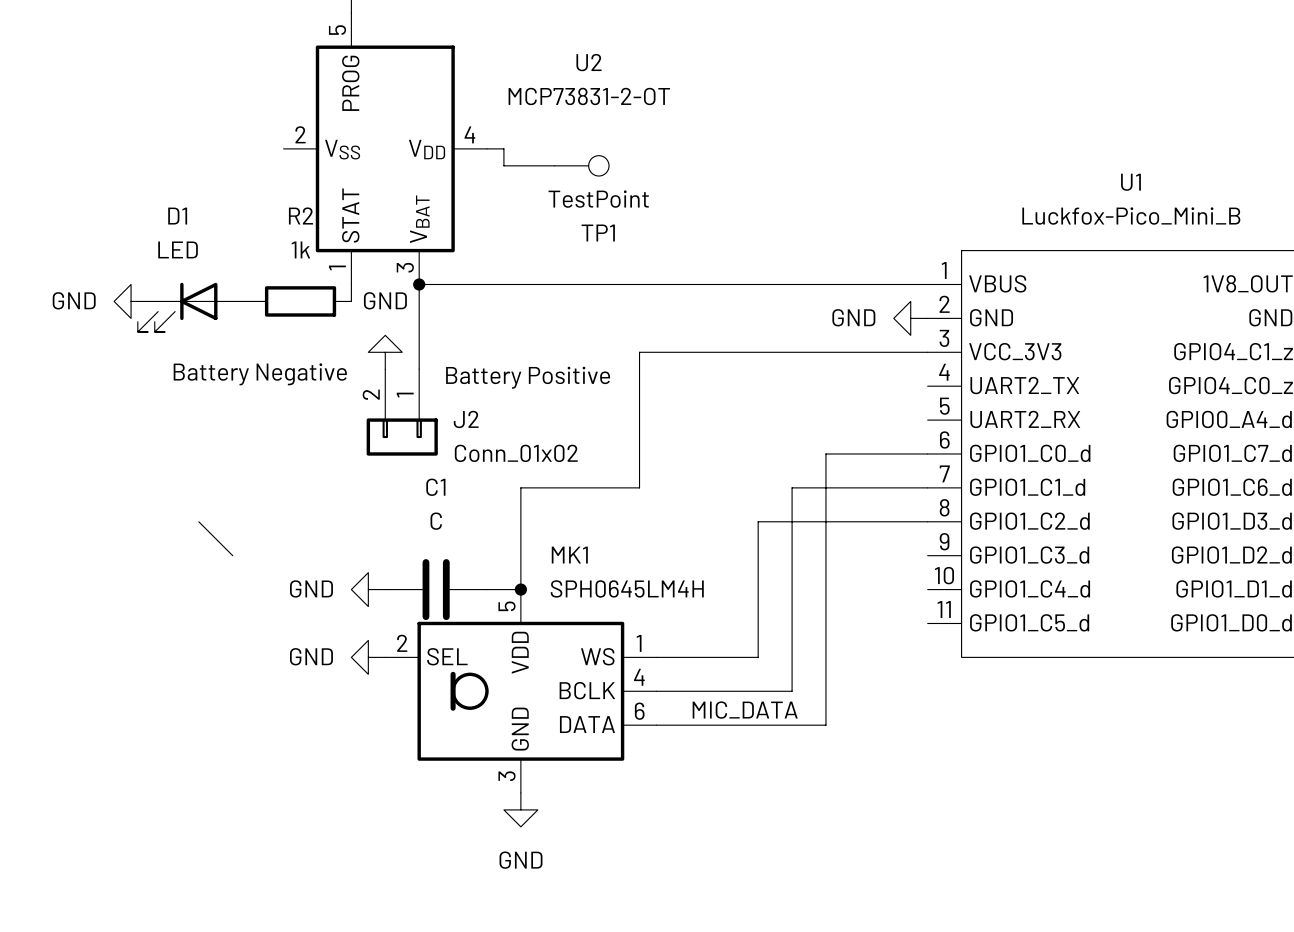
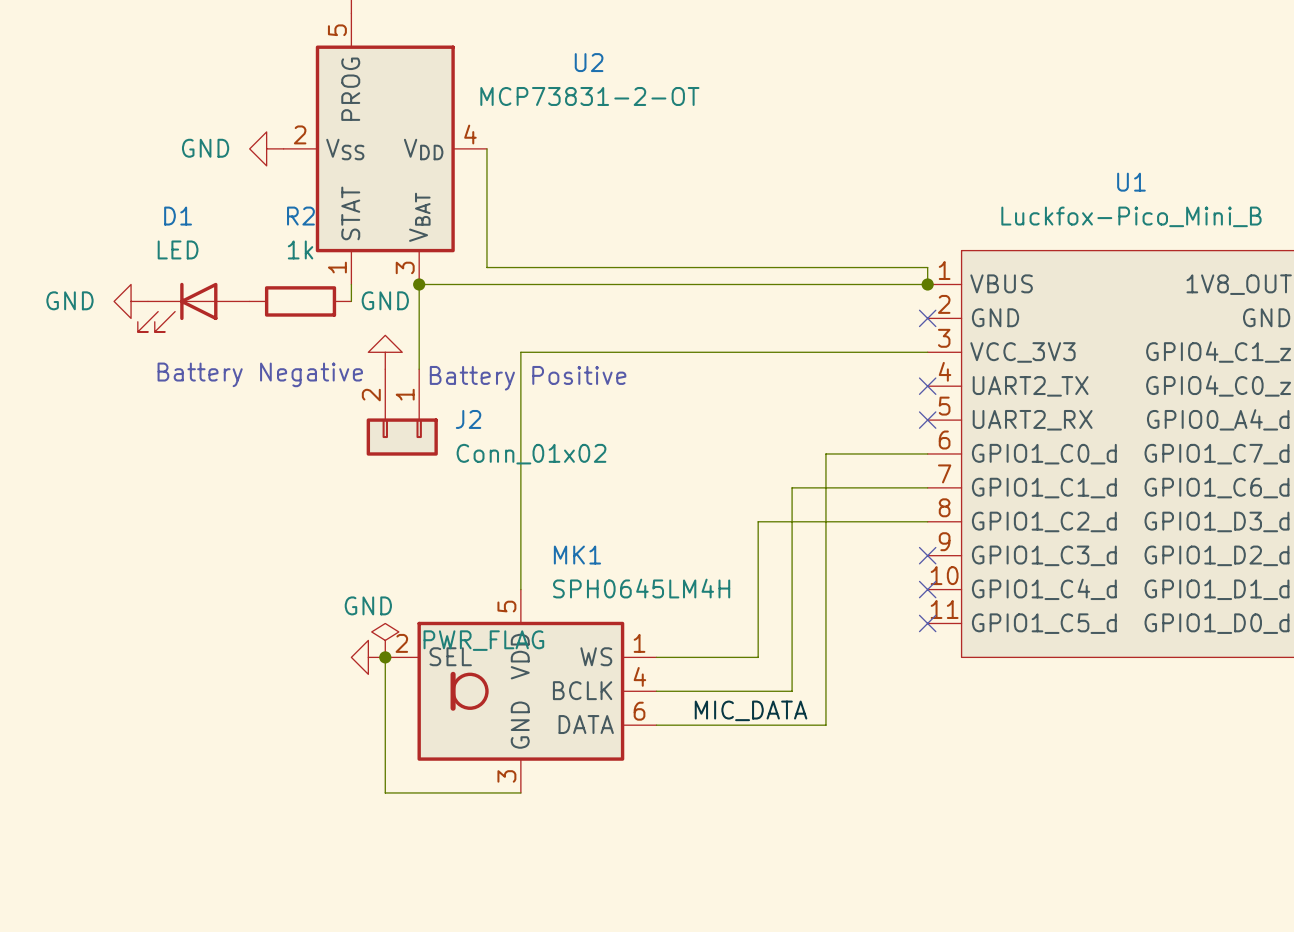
power symbol: none -> GND (266, 148)
wire: (486, 148) (503, 148) (503, 165) (554, 165) -> (486, 148) (486, 267) (927, 267) (927, 284)
TP1: TestPoint (581, 165) -> none
junction: none -> (927, 284)
power symbol: GND (910, 318) -> none
no-connect mark: none -> (927, 318)
wire: (639, 352) (639, 487) (520, 487) -> (639, 352) (520, 352) (520, 487)
no-connect mark: none -> (927, 386)
no-connect mark: none -> (927, 420)
wire: (198, 521) (232, 555) -> none
no-connect mark: none -> (927, 555)
power symbol: GND (368, 589) -> none
C1: C (436, 589) -> none
wire: (486, 589) (520, 589) -> none
junction: (520, 589) -> none
no-connect mark: none -> (927, 589)
no-connect mark: none -> (927, 623)
power symbol: none -> PWR_FLAG (385, 640)
power symbol text position: GND (311, 656) -> GND (368, 605)
wire: none -> (385, 657) (385, 792) (520, 792)
junction: none -> (385, 657)
power symbol: GND (520, 809) -> none

